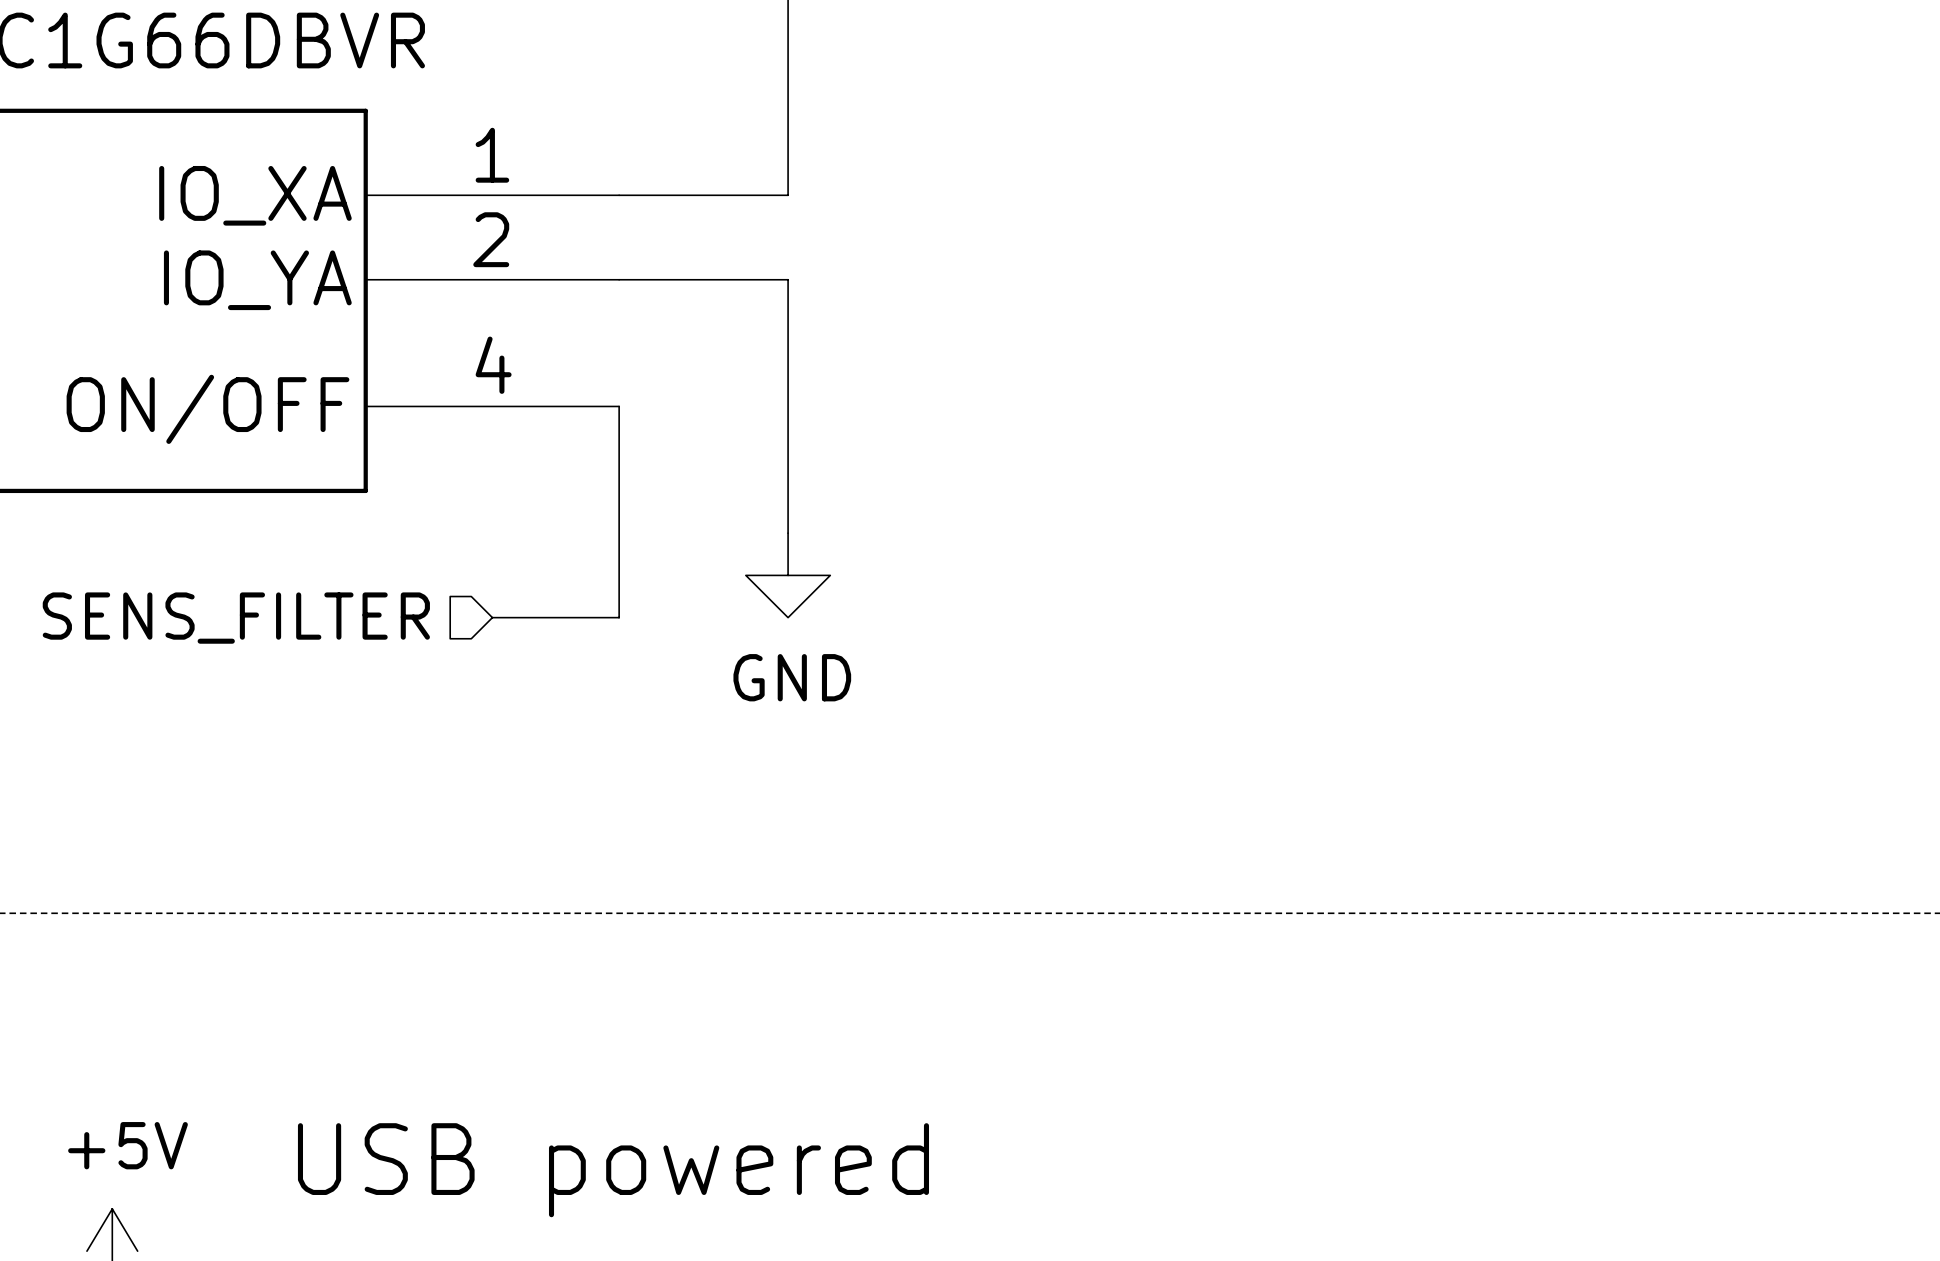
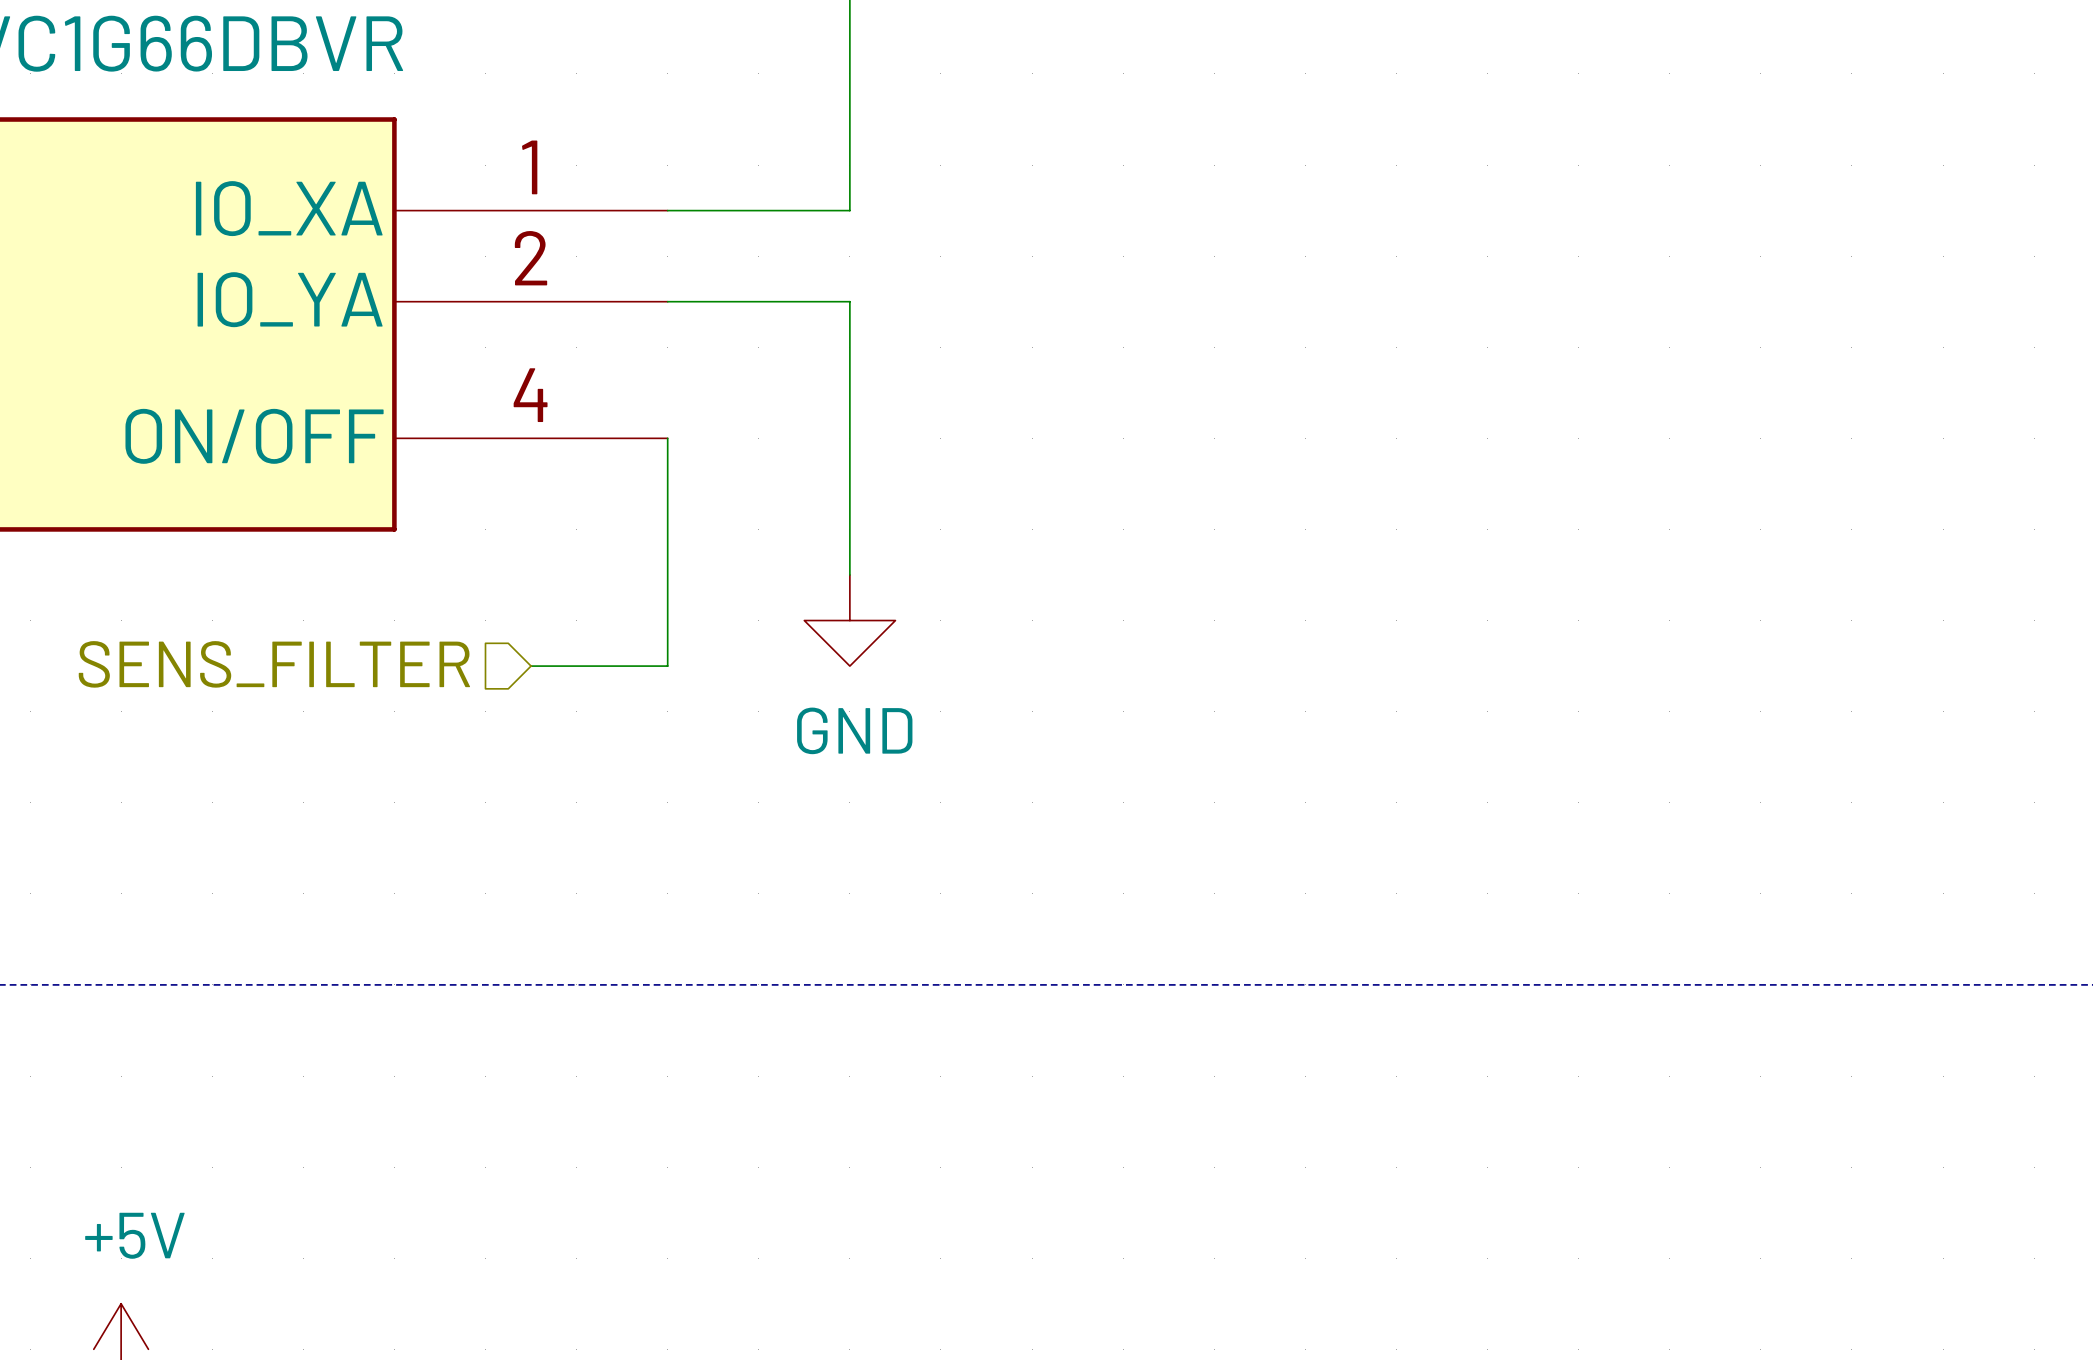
text: USB powered (613, 1170) -> none

